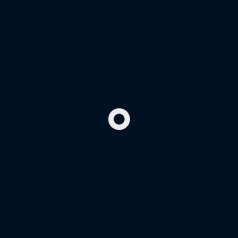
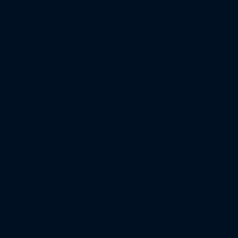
via: (119, 119) -> none

